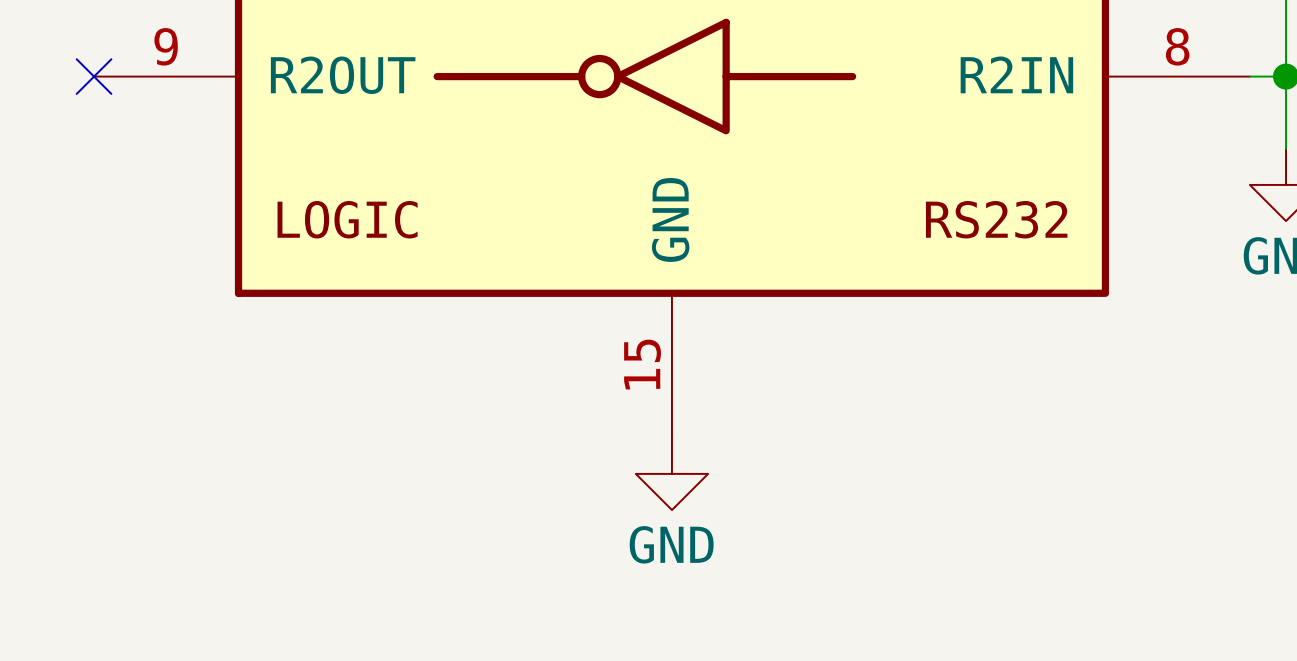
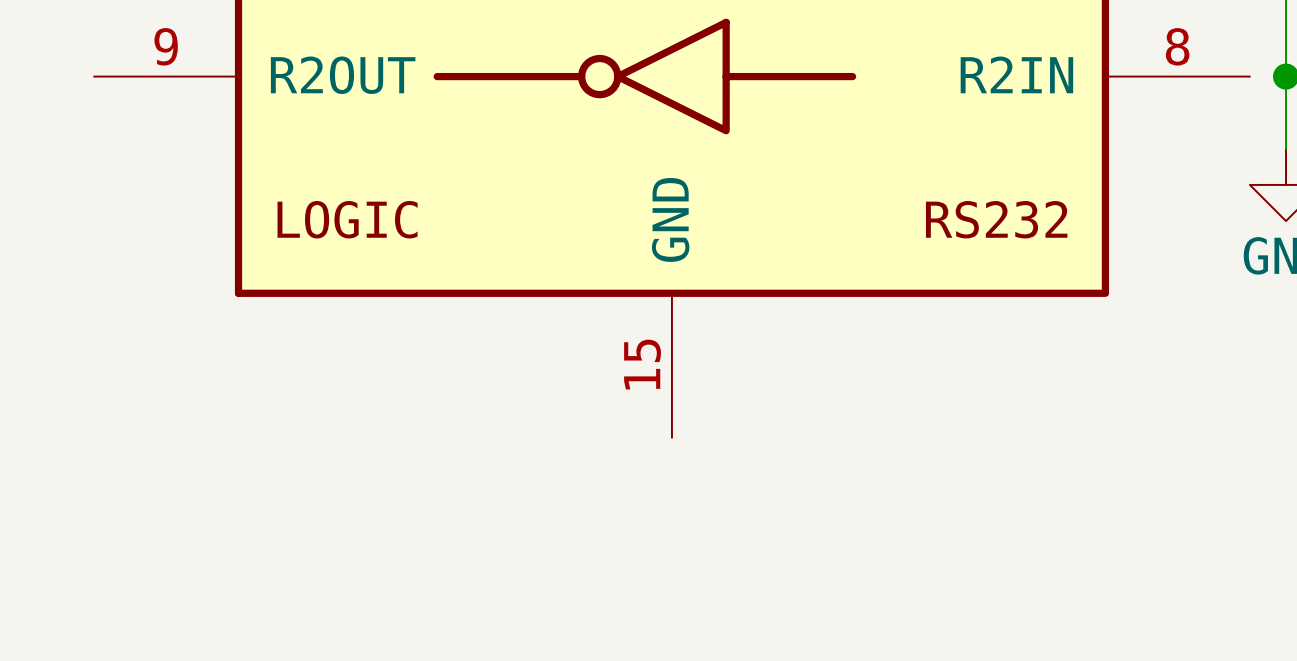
no-connect mark: (94, 76) -> none
wire: (1249, 76) (1286, 76) -> none
power symbol: GND (671, 473) -> none

